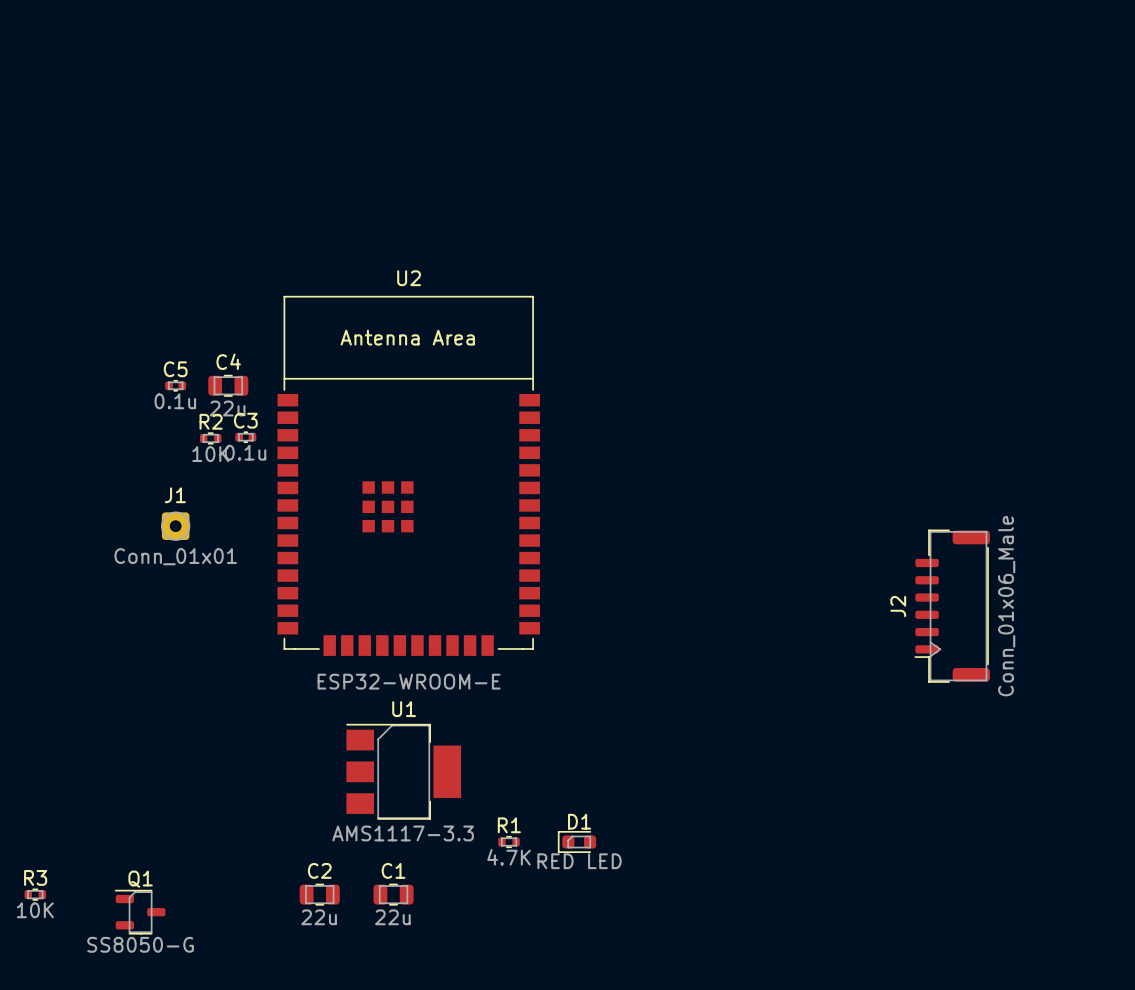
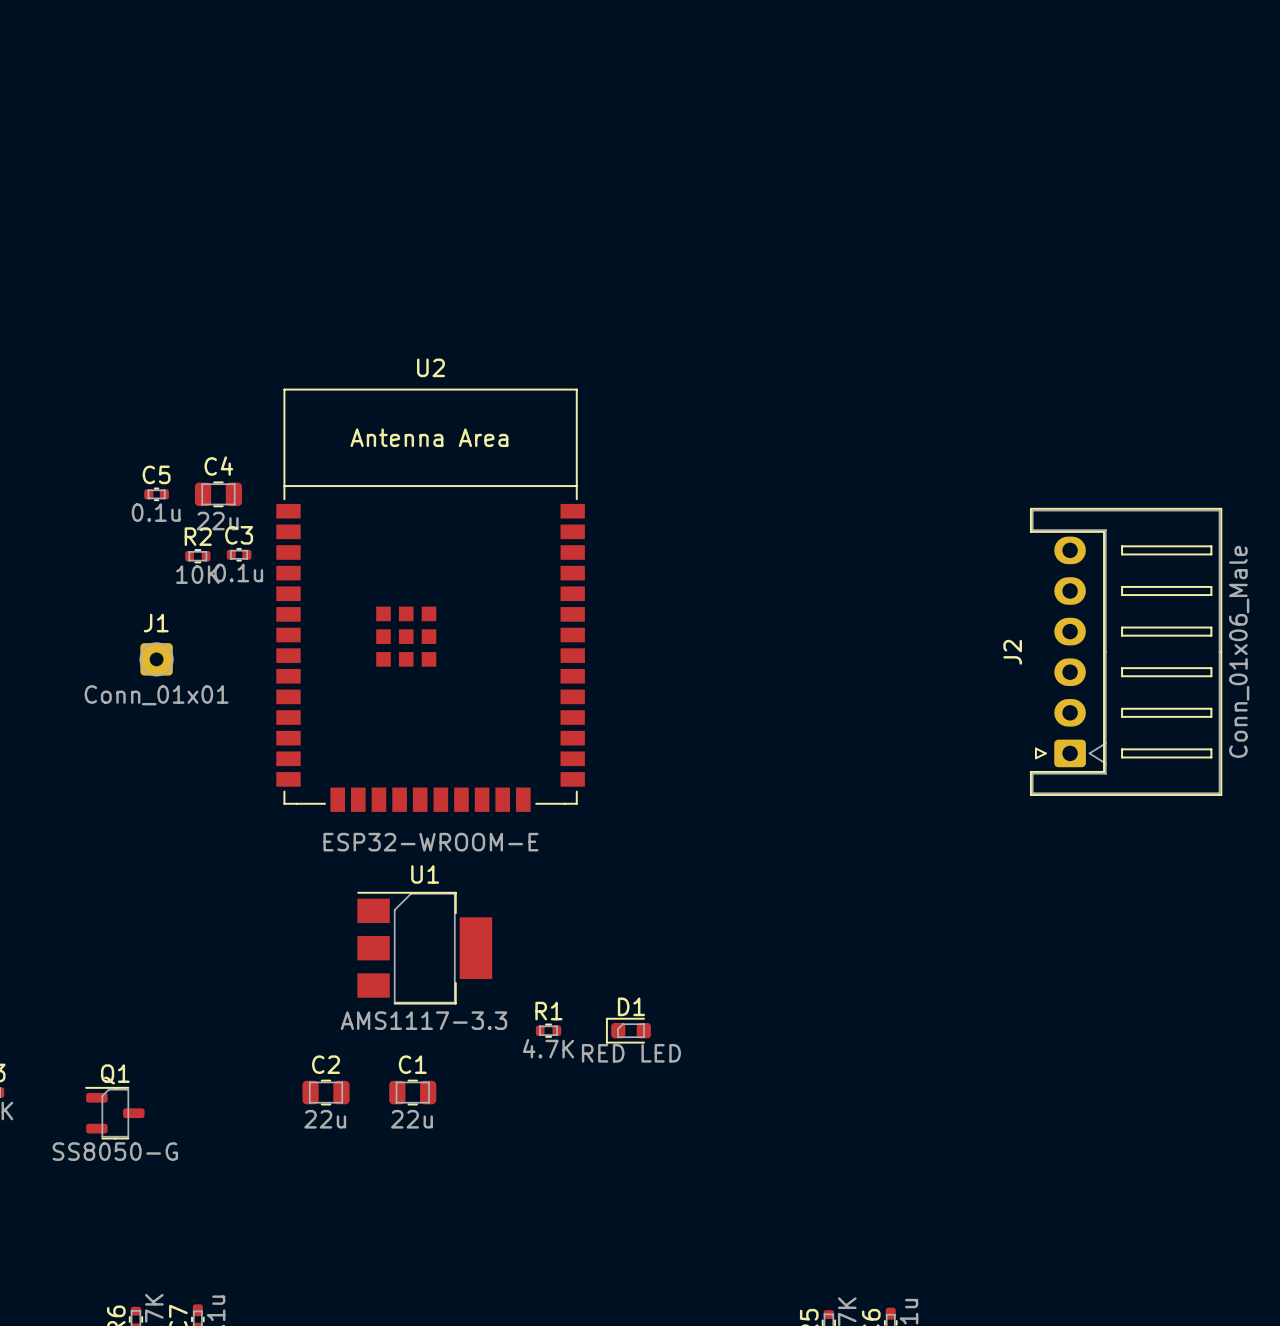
J2 footprint: [914, 529, 990, 683] -> [1029, 507, 1223, 796]
J2 name position: J2 (898, 606) -> J2 (1012, 652)
J2 value position: Conn_01x06_Male (1006, 606) -> Conn_01x06_Male (1239, 651)

